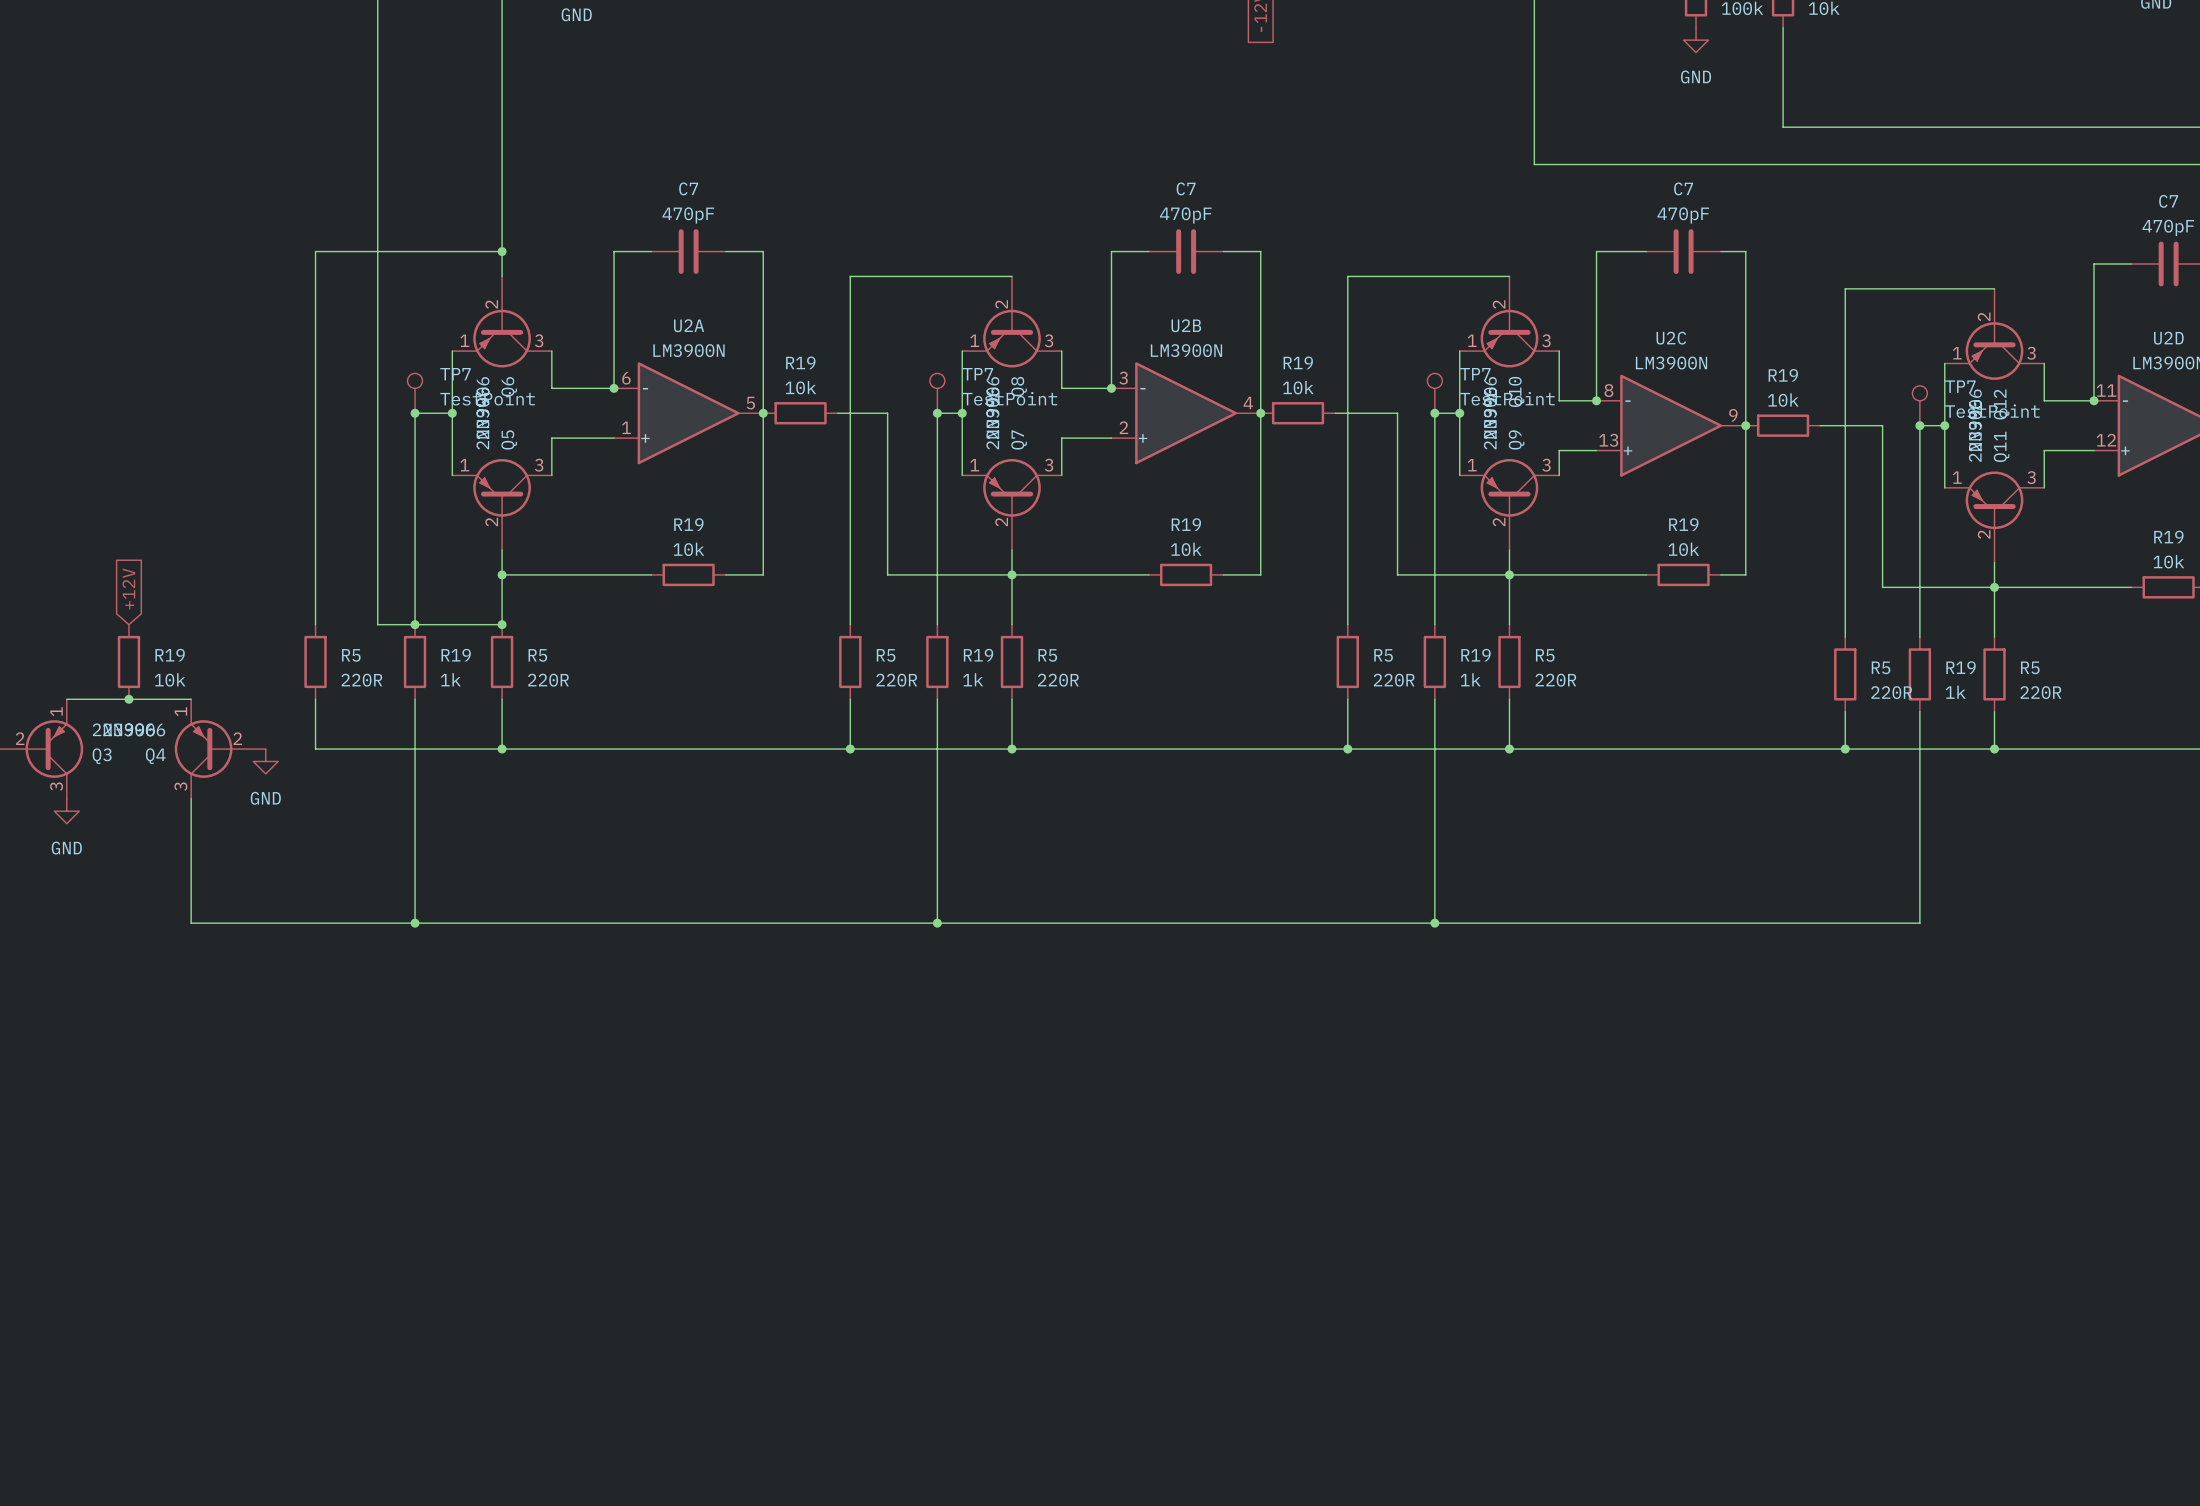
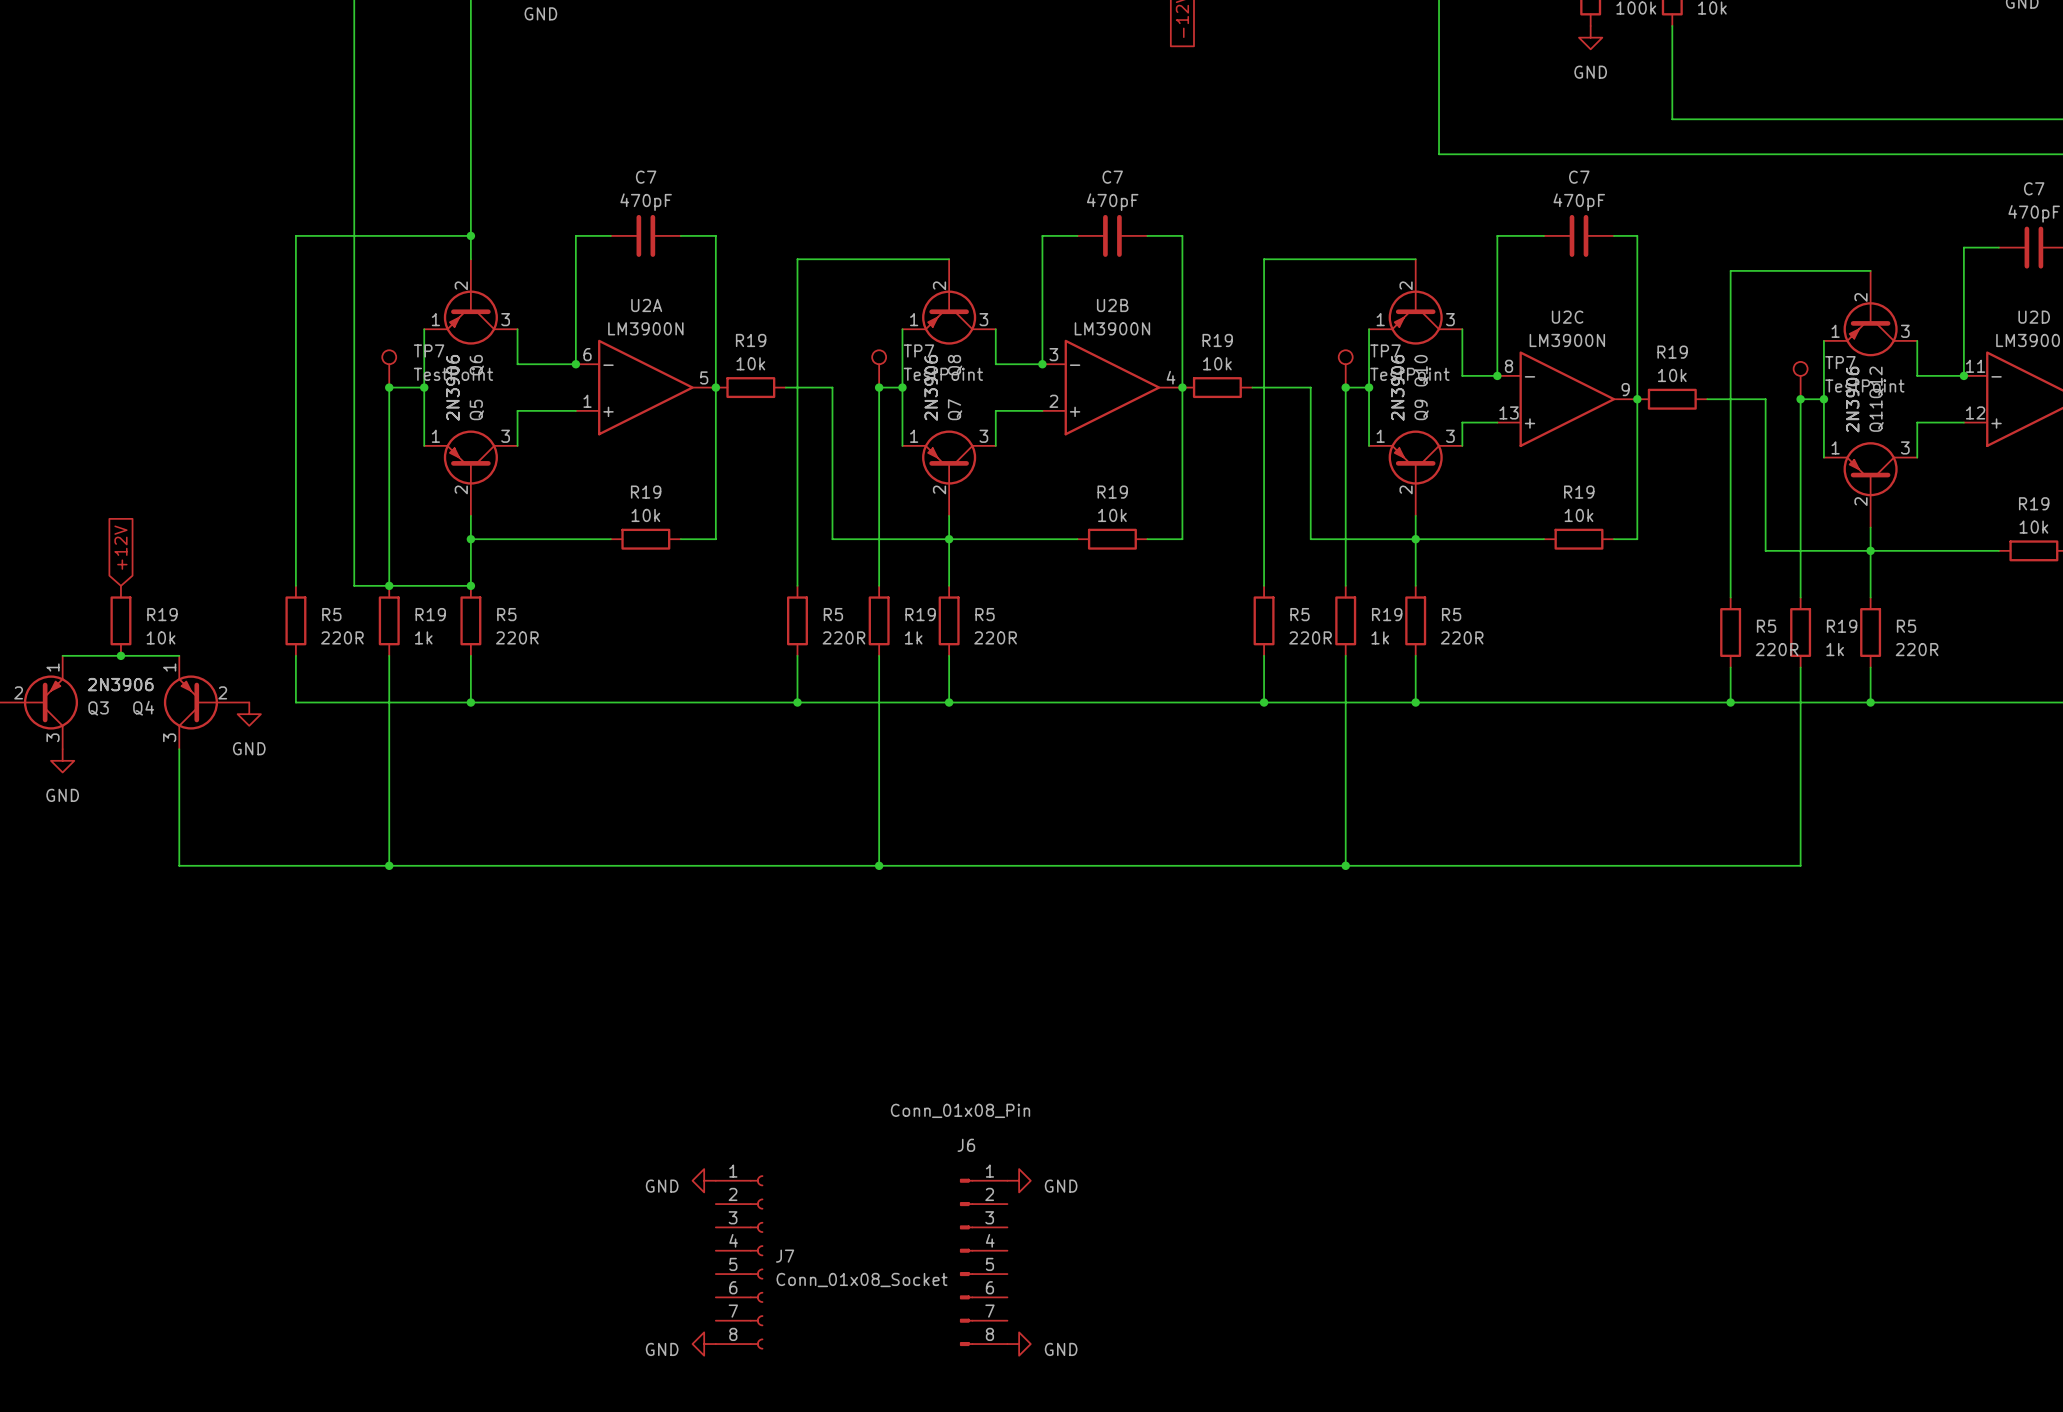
power symbol: none -> GND (704, 1180)
power symbol: none -> GND (1019, 1180)
J7: none -> Conn_01x08_Socket (739, 1262)
J6: none -> Conn_01x08_Pin (983, 1262)
power symbol: none -> GND (704, 1344)
power symbol: none -> GND (1019, 1344)

